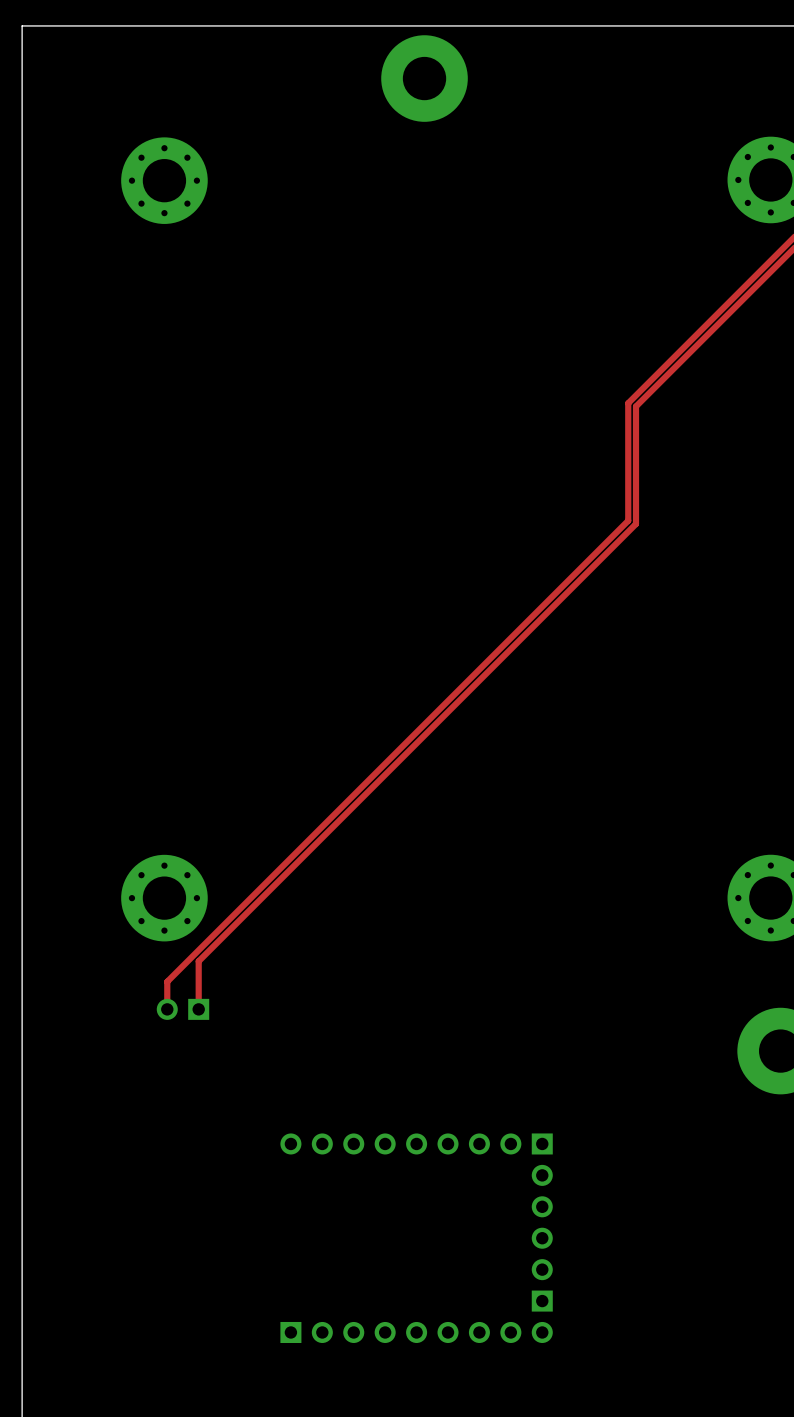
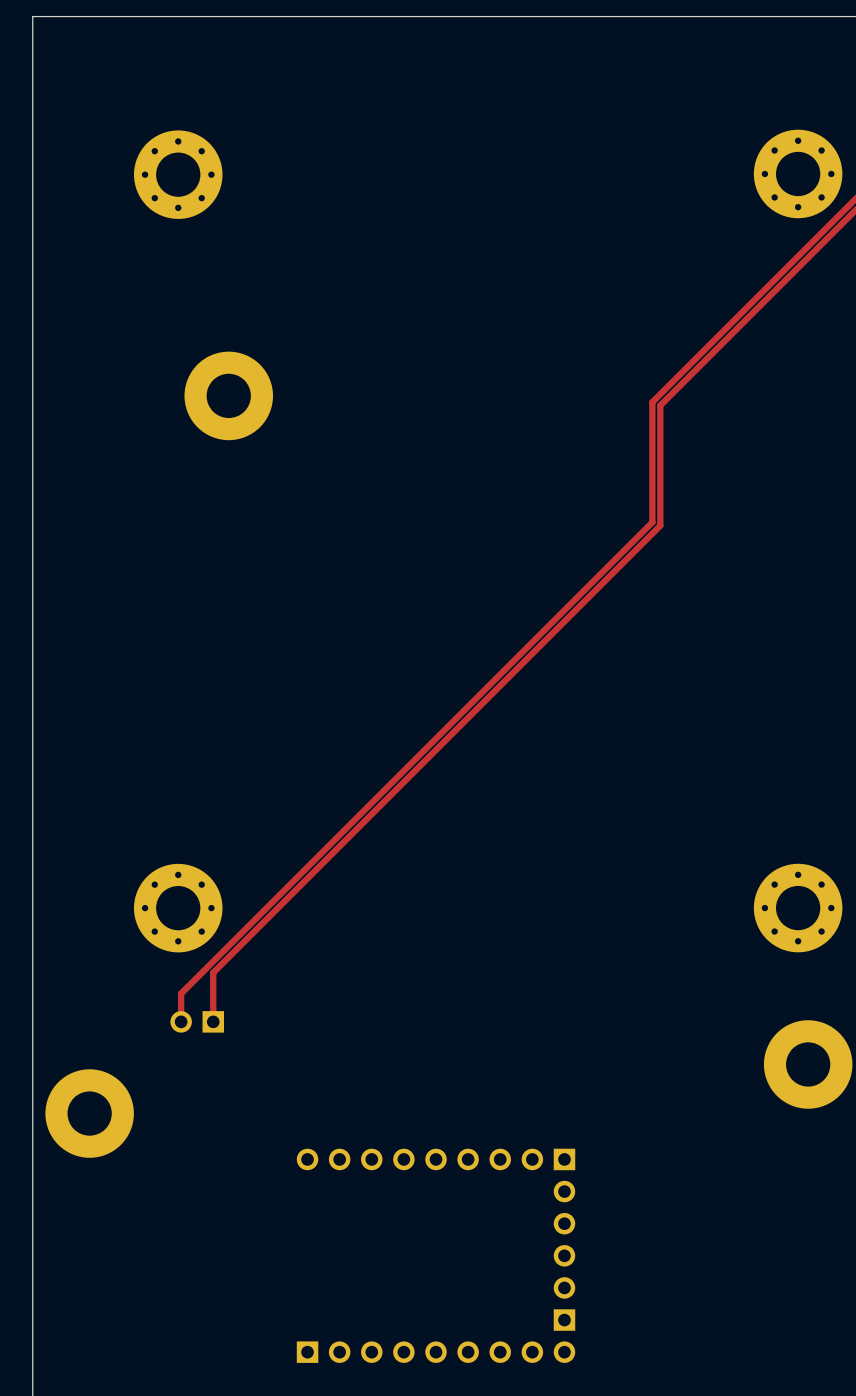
part: (424, 78) -> none
part: none -> (228, 395)
part: none -> (89, 1113)

